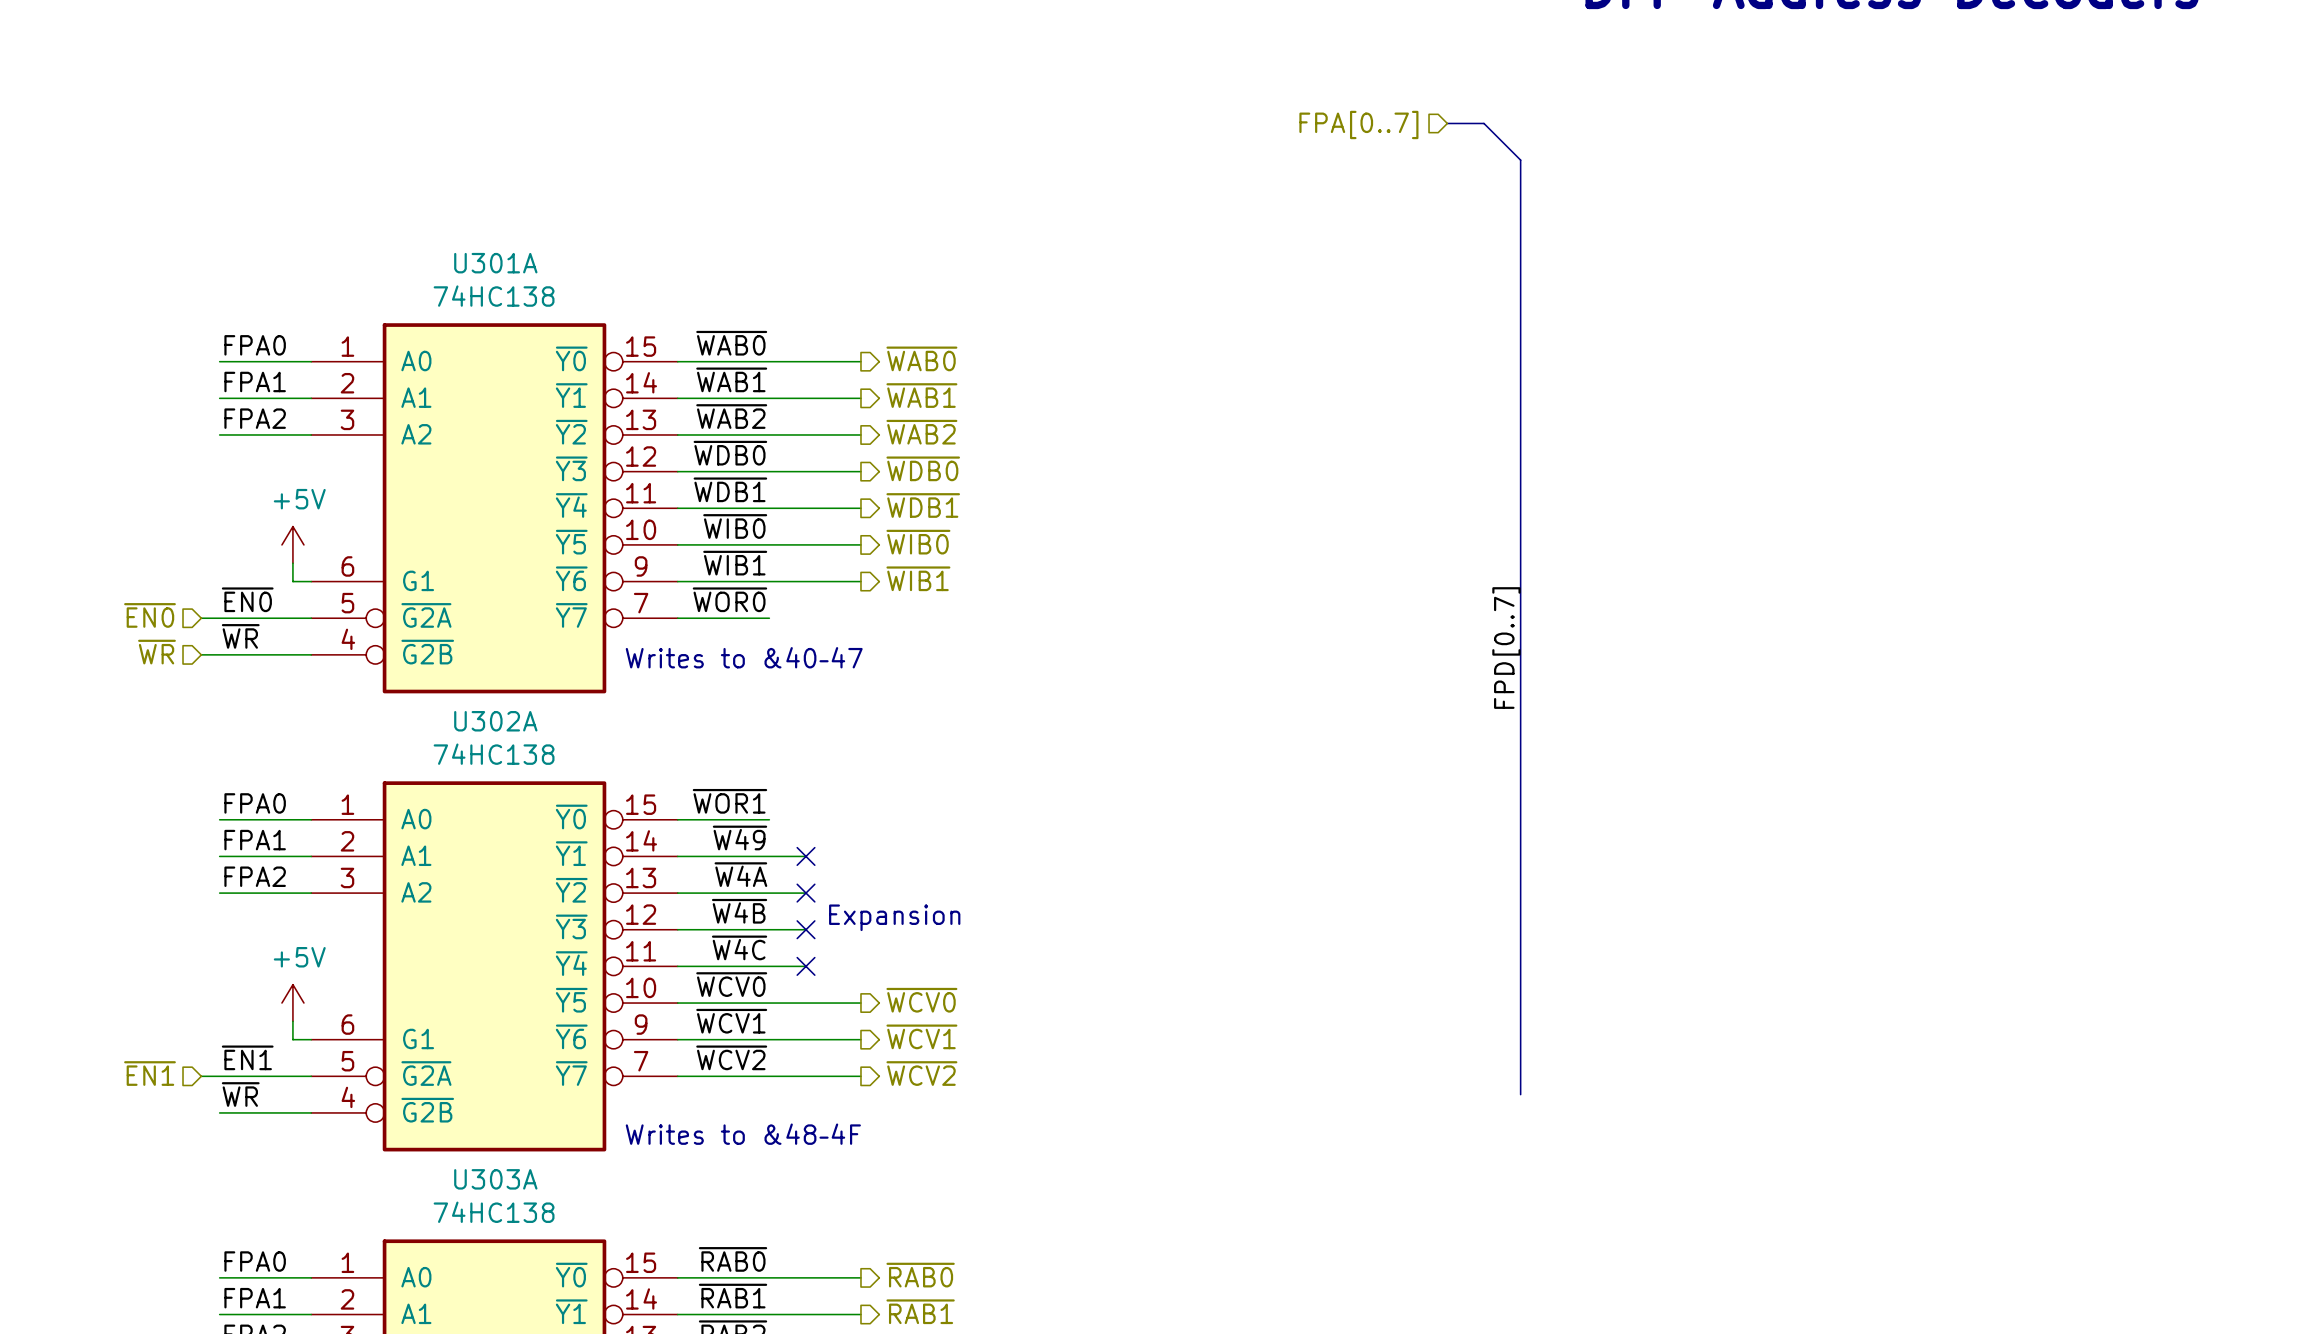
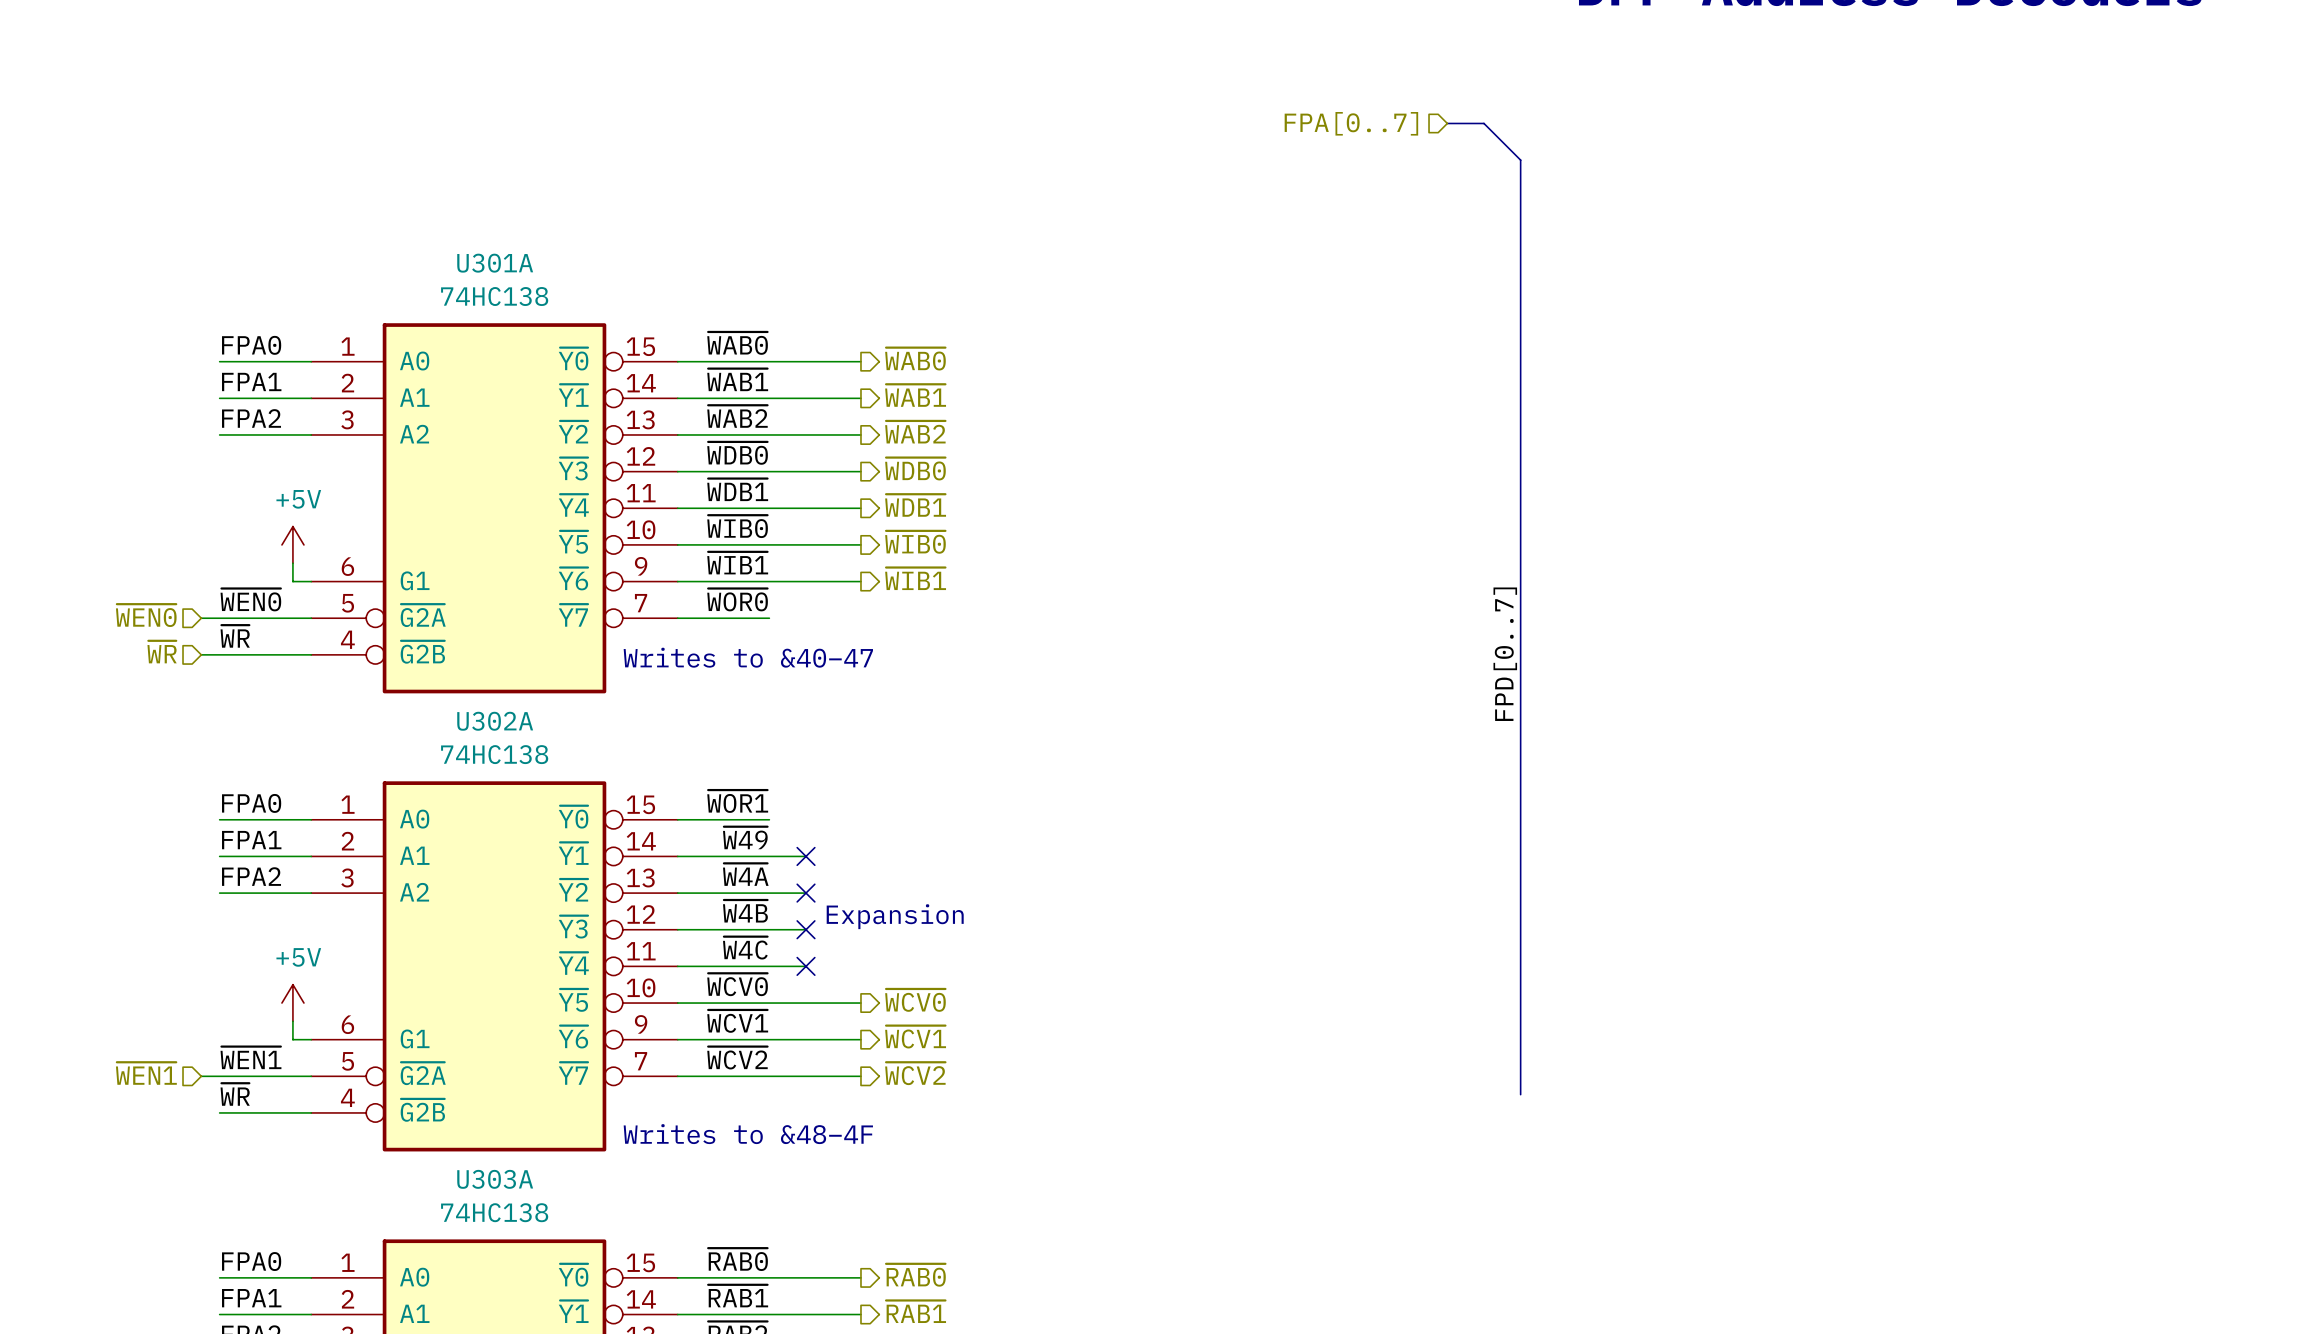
label: ~{EN0} (247, 599) -> ~{WEN0} (250, 599)
hierarchical label: ~{EN0} (150, 615) -> ~{WEN0} (146, 615)
label: ~{EN1} (247, 1057) -> ~{WEN1} (251, 1057)
hierarchical label: ~{EN1} (150, 1073) -> ~{WEN1} (146, 1073)

